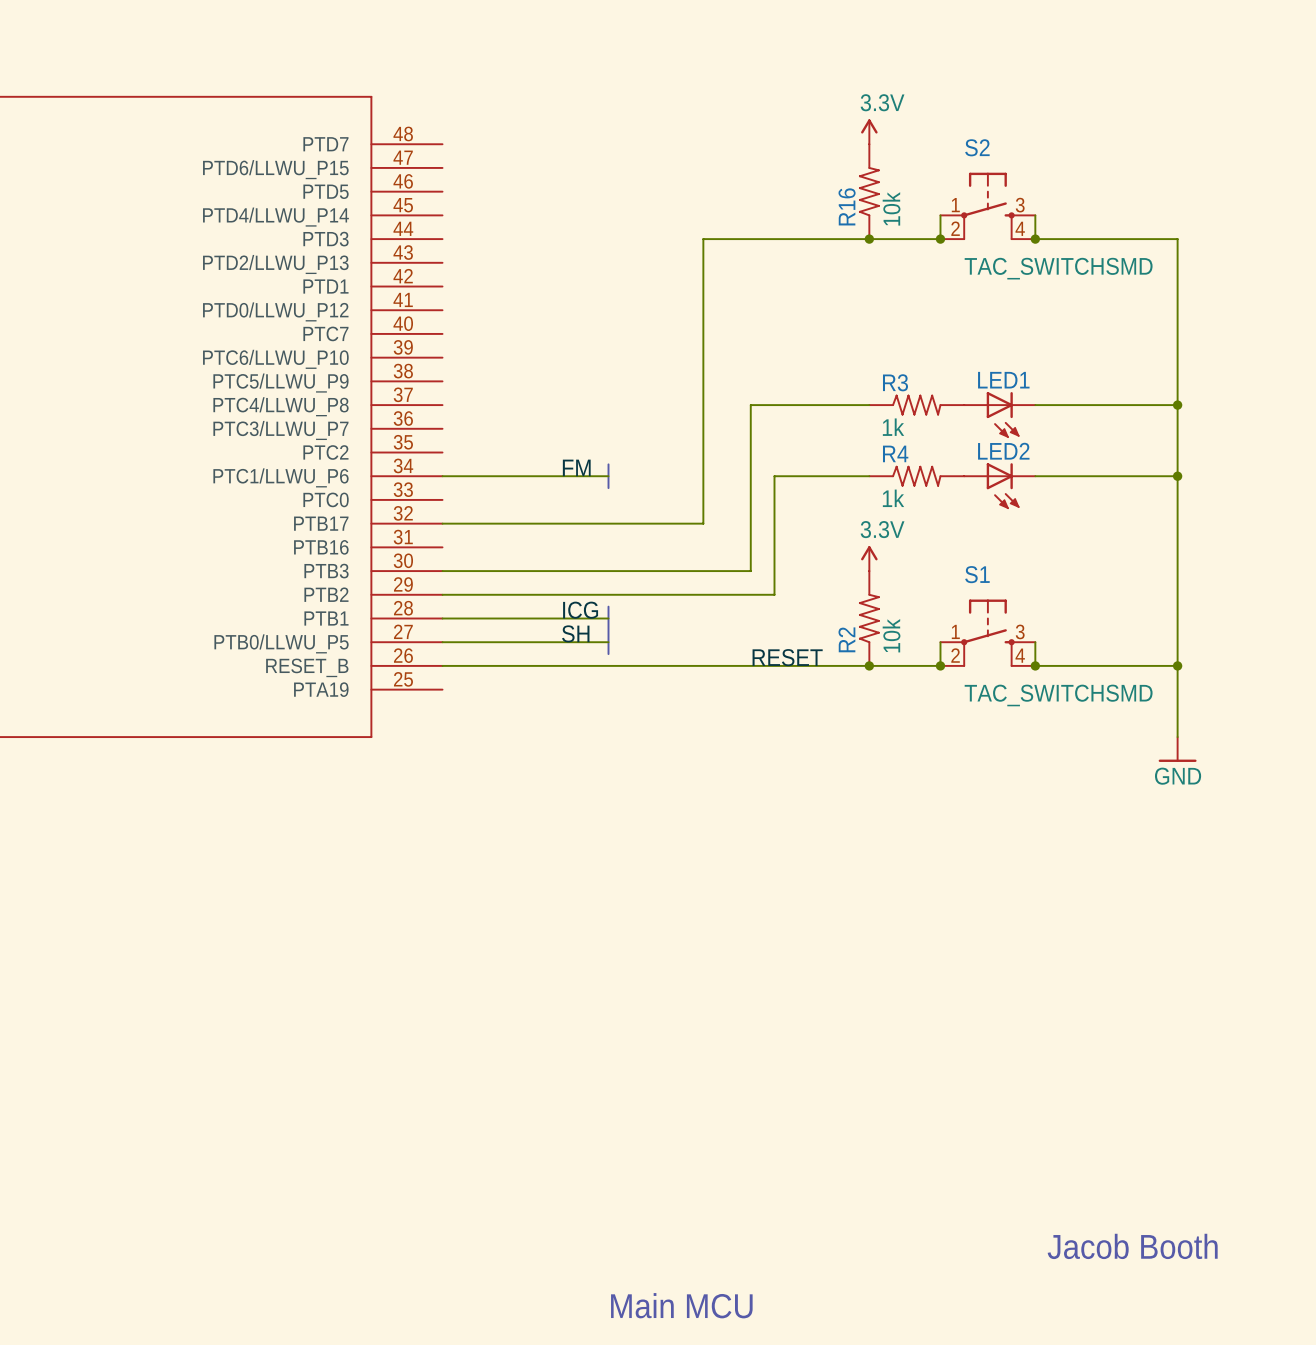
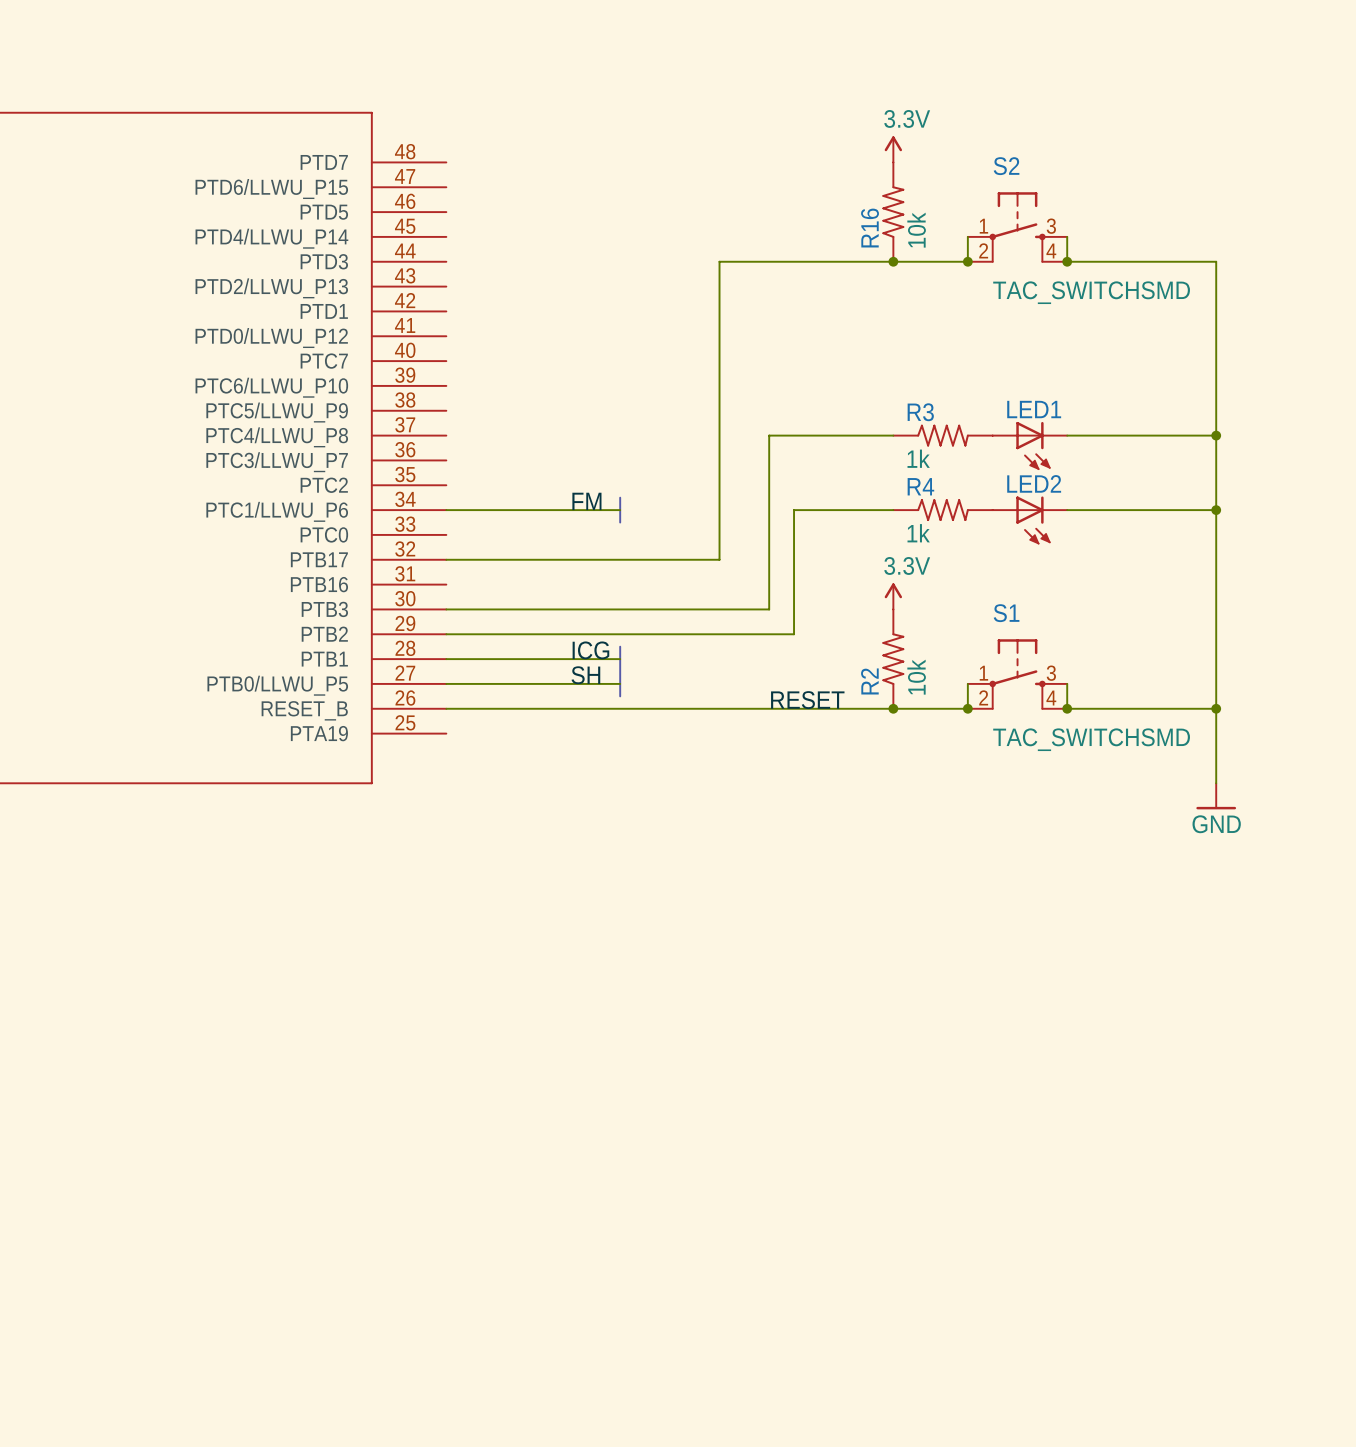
text: Jacob Booth (1132, 1246) -> none
text: Main MCU (681, 1305) -> none

